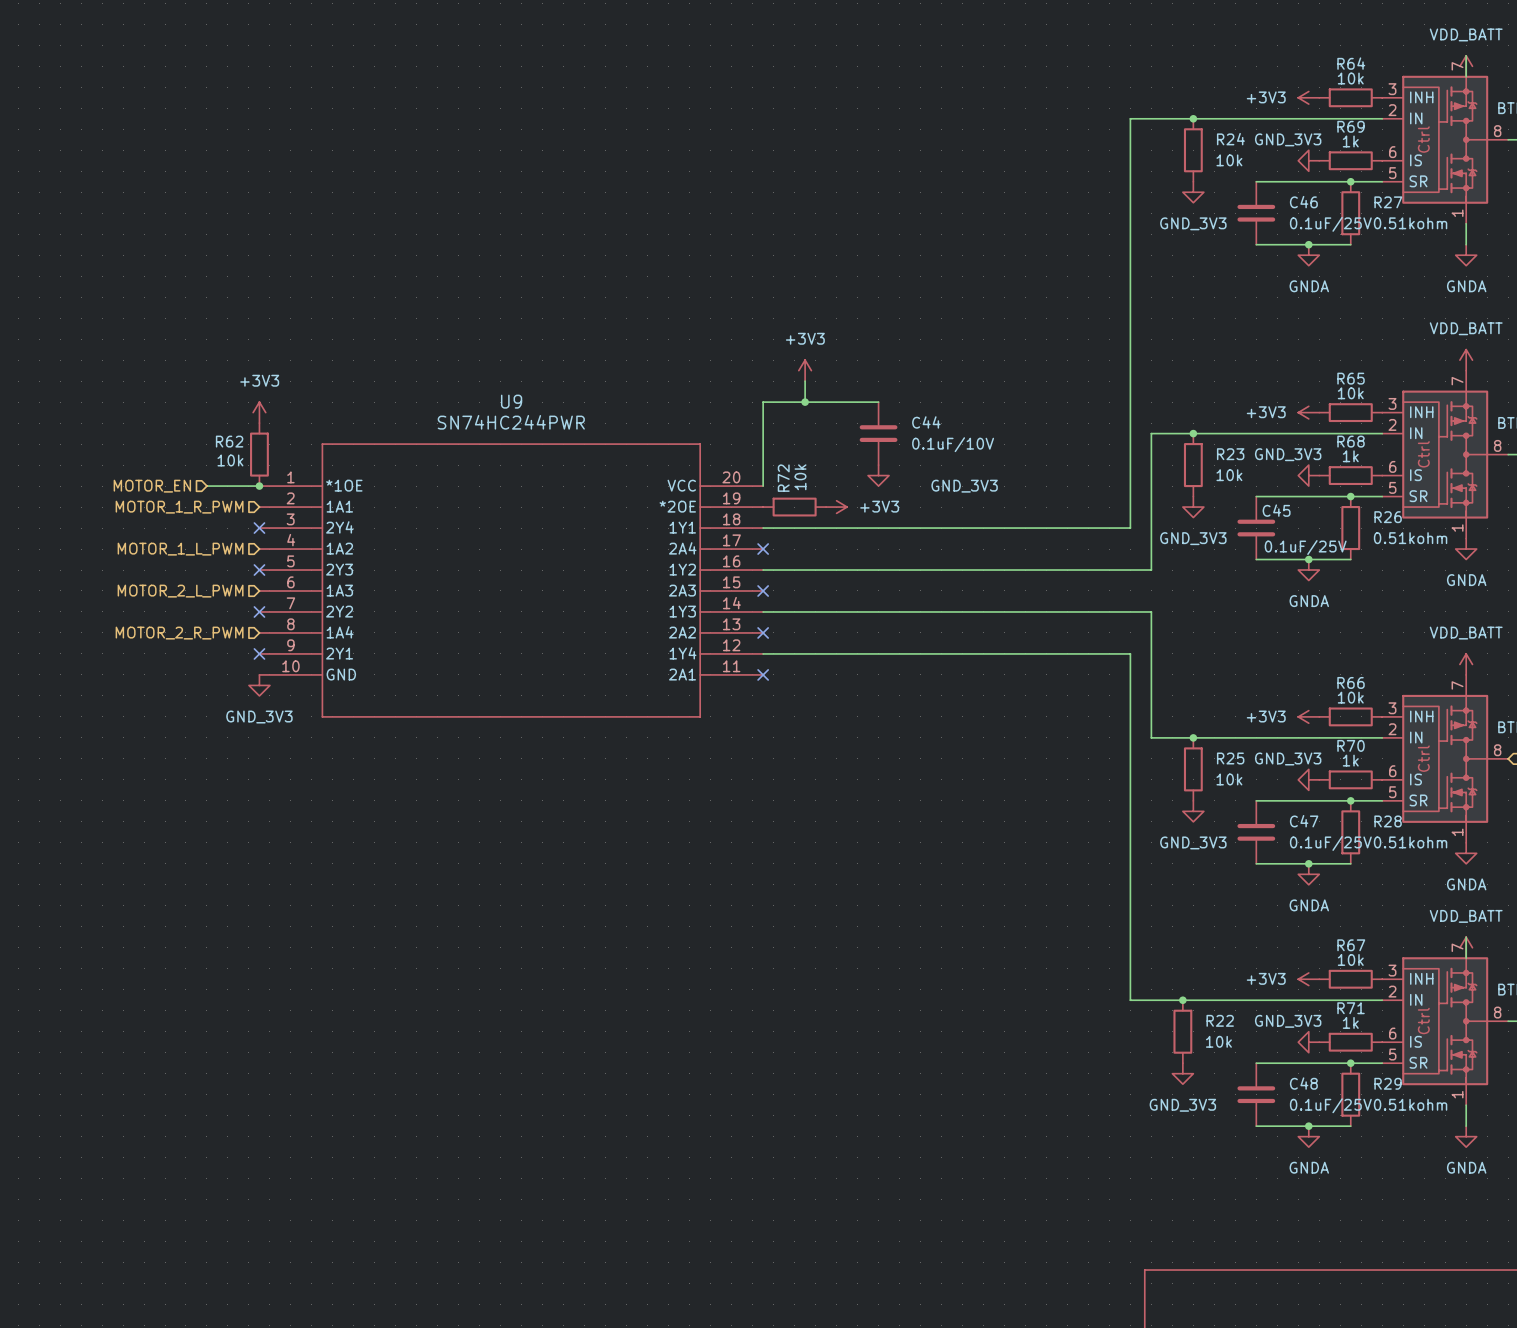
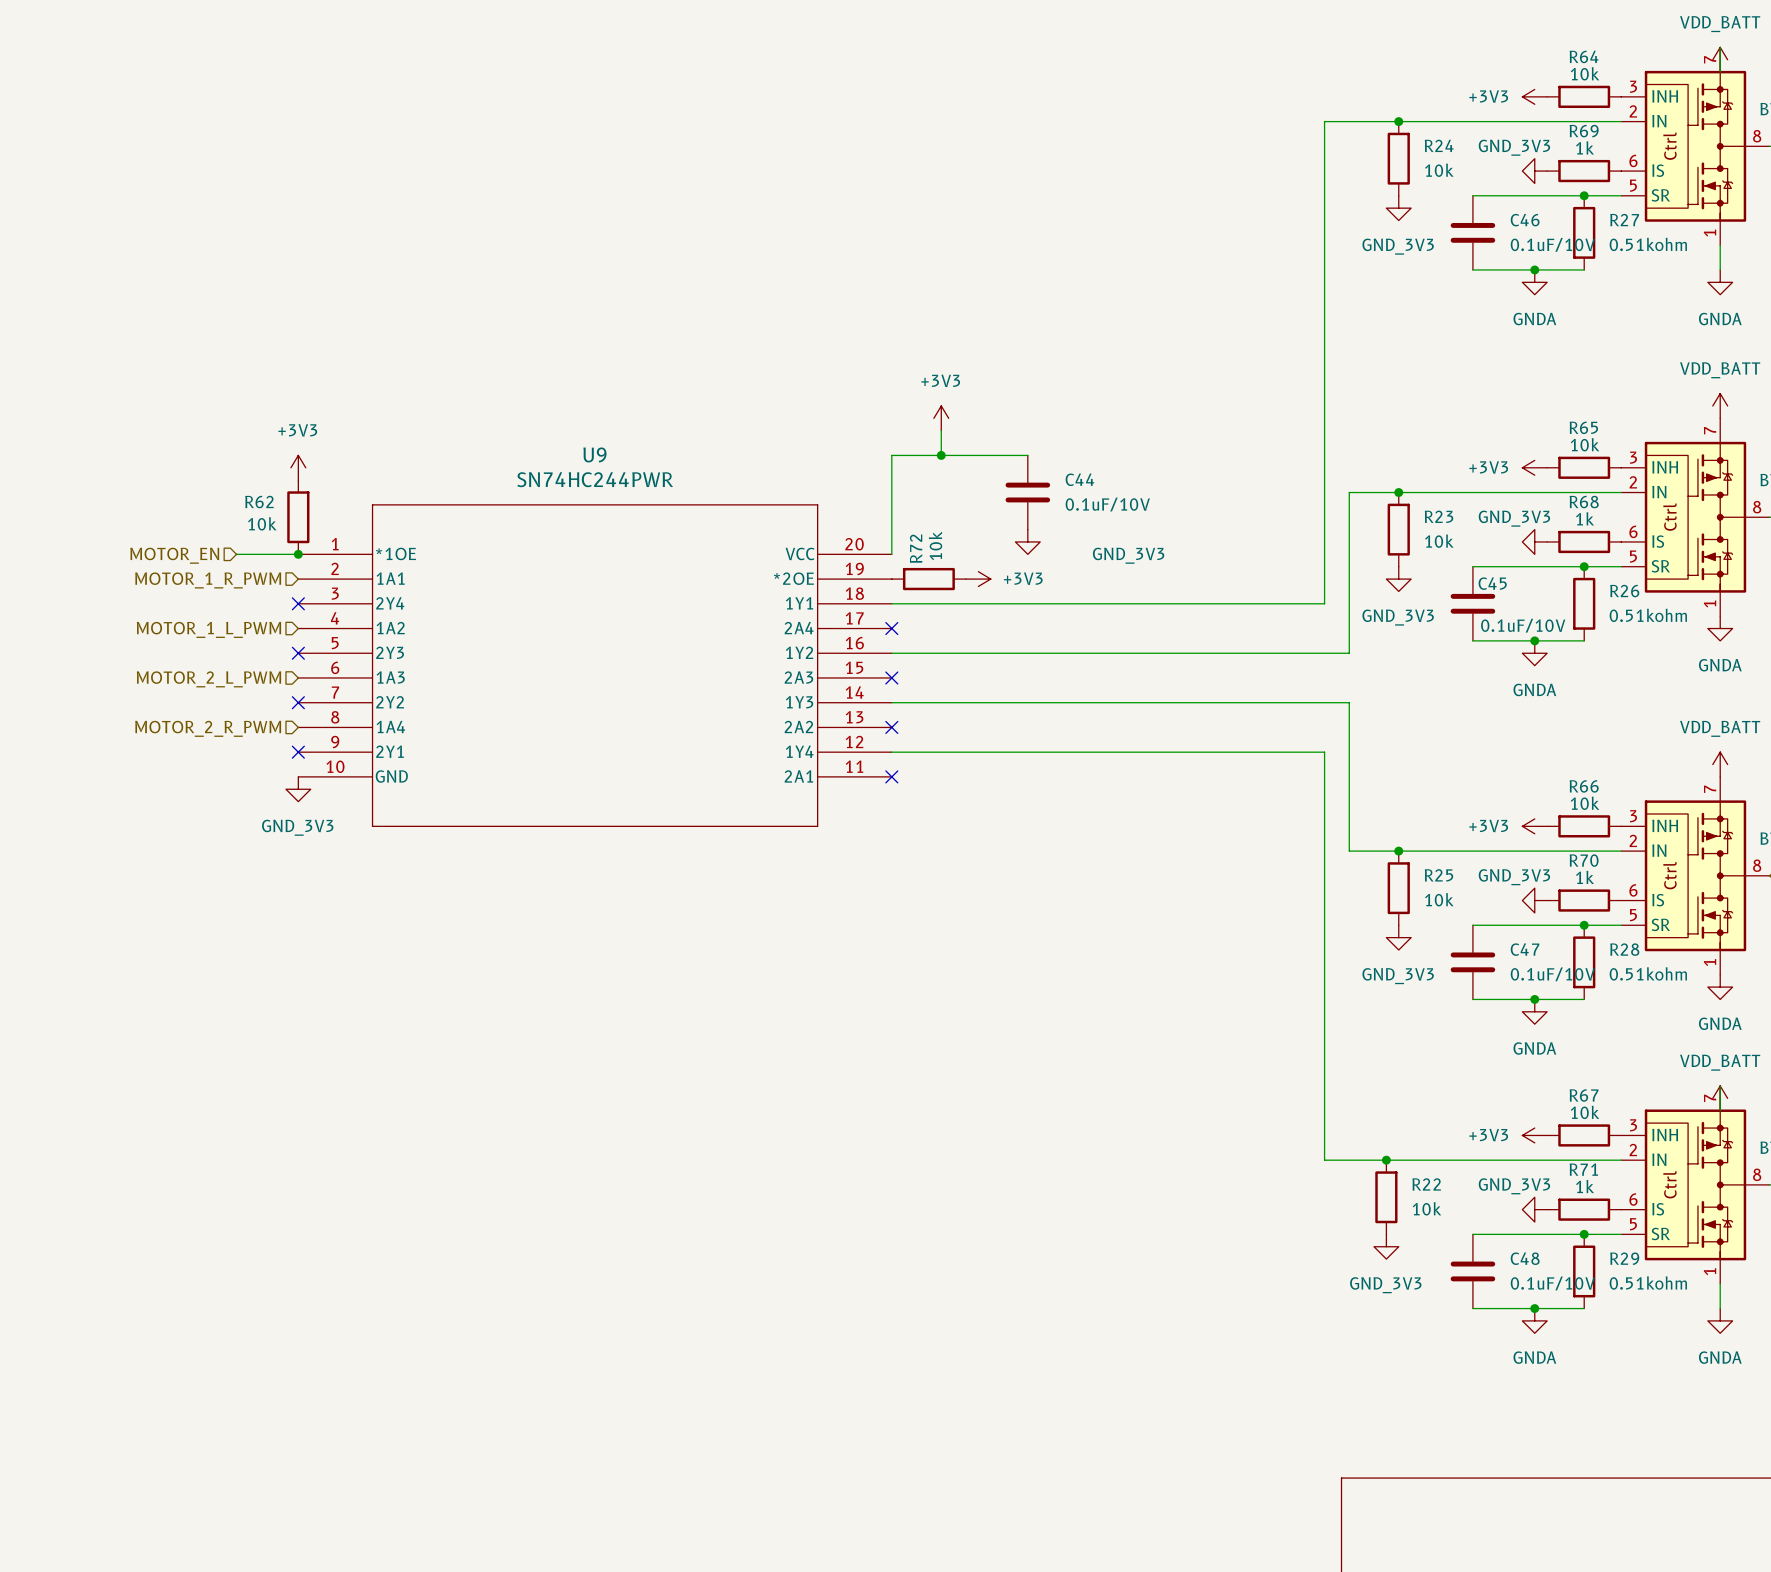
C46 value: 0.1uF/25V (1330, 224) -> 0.1uF/10V (1552, 244)
C45 value: 0.1uF/25V (1305, 547) -> 0.1uF/10V (1523, 625)
C47 value: 0.1uF/25V (1330, 843) -> 0.1uF/10V (1552, 974)
C48 value: 0.1uF/25V (1330, 1105) -> 0.1uF/10V (1552, 1283)

